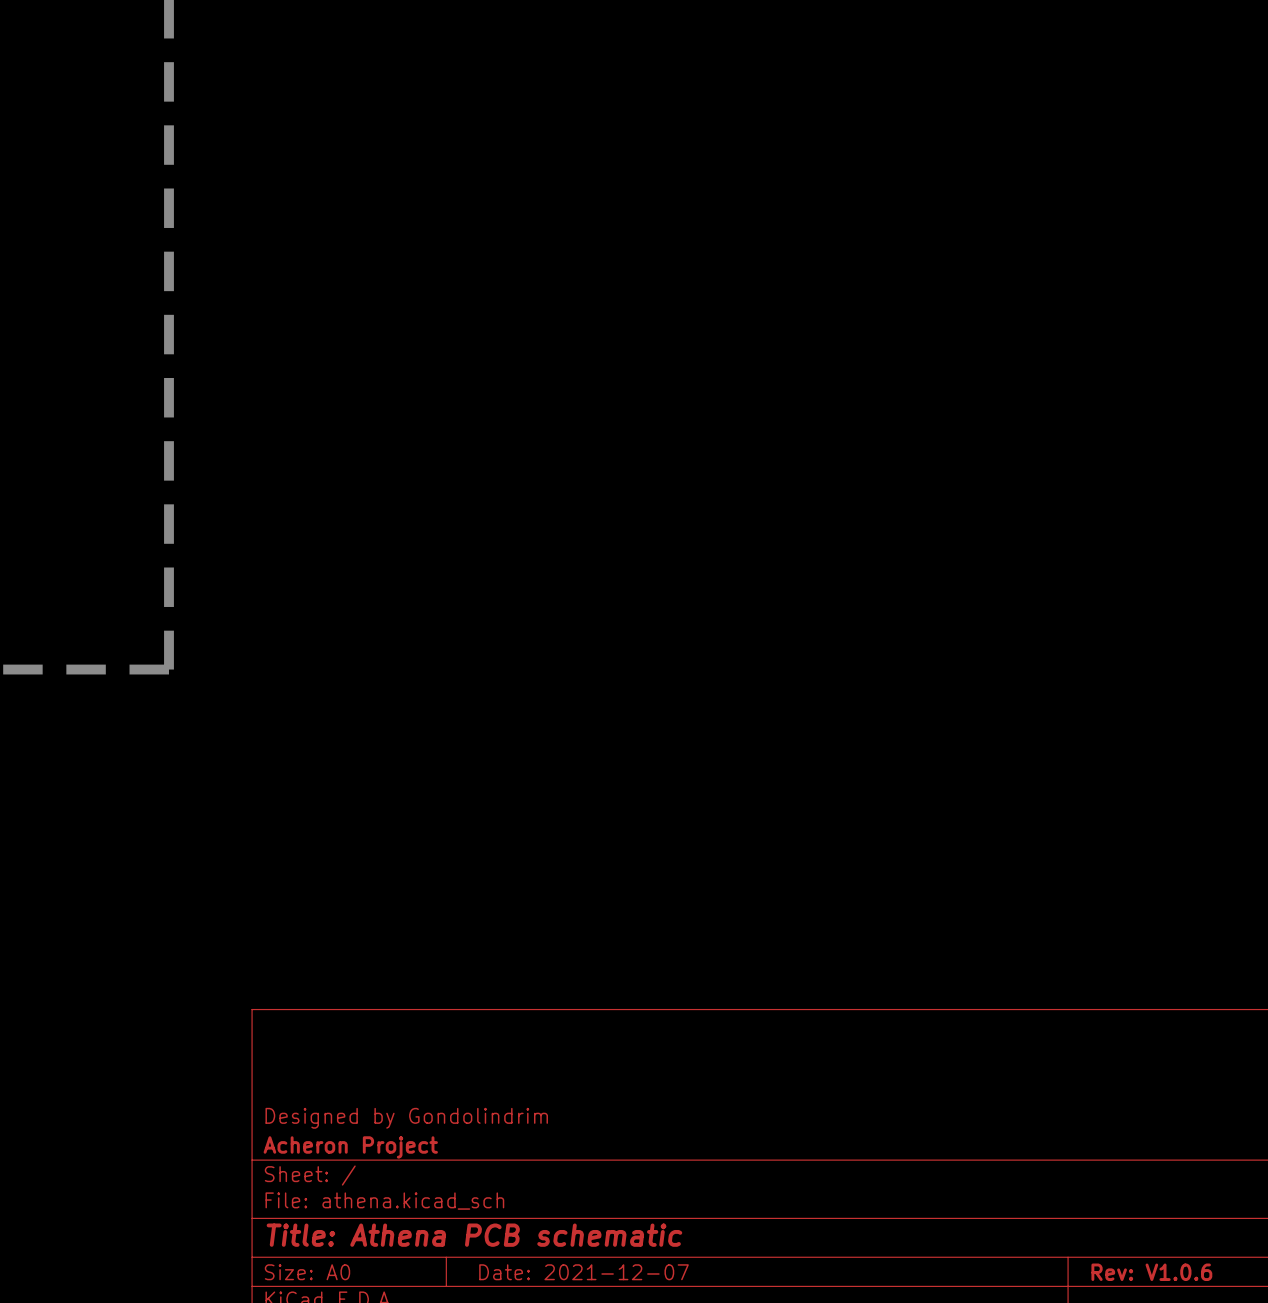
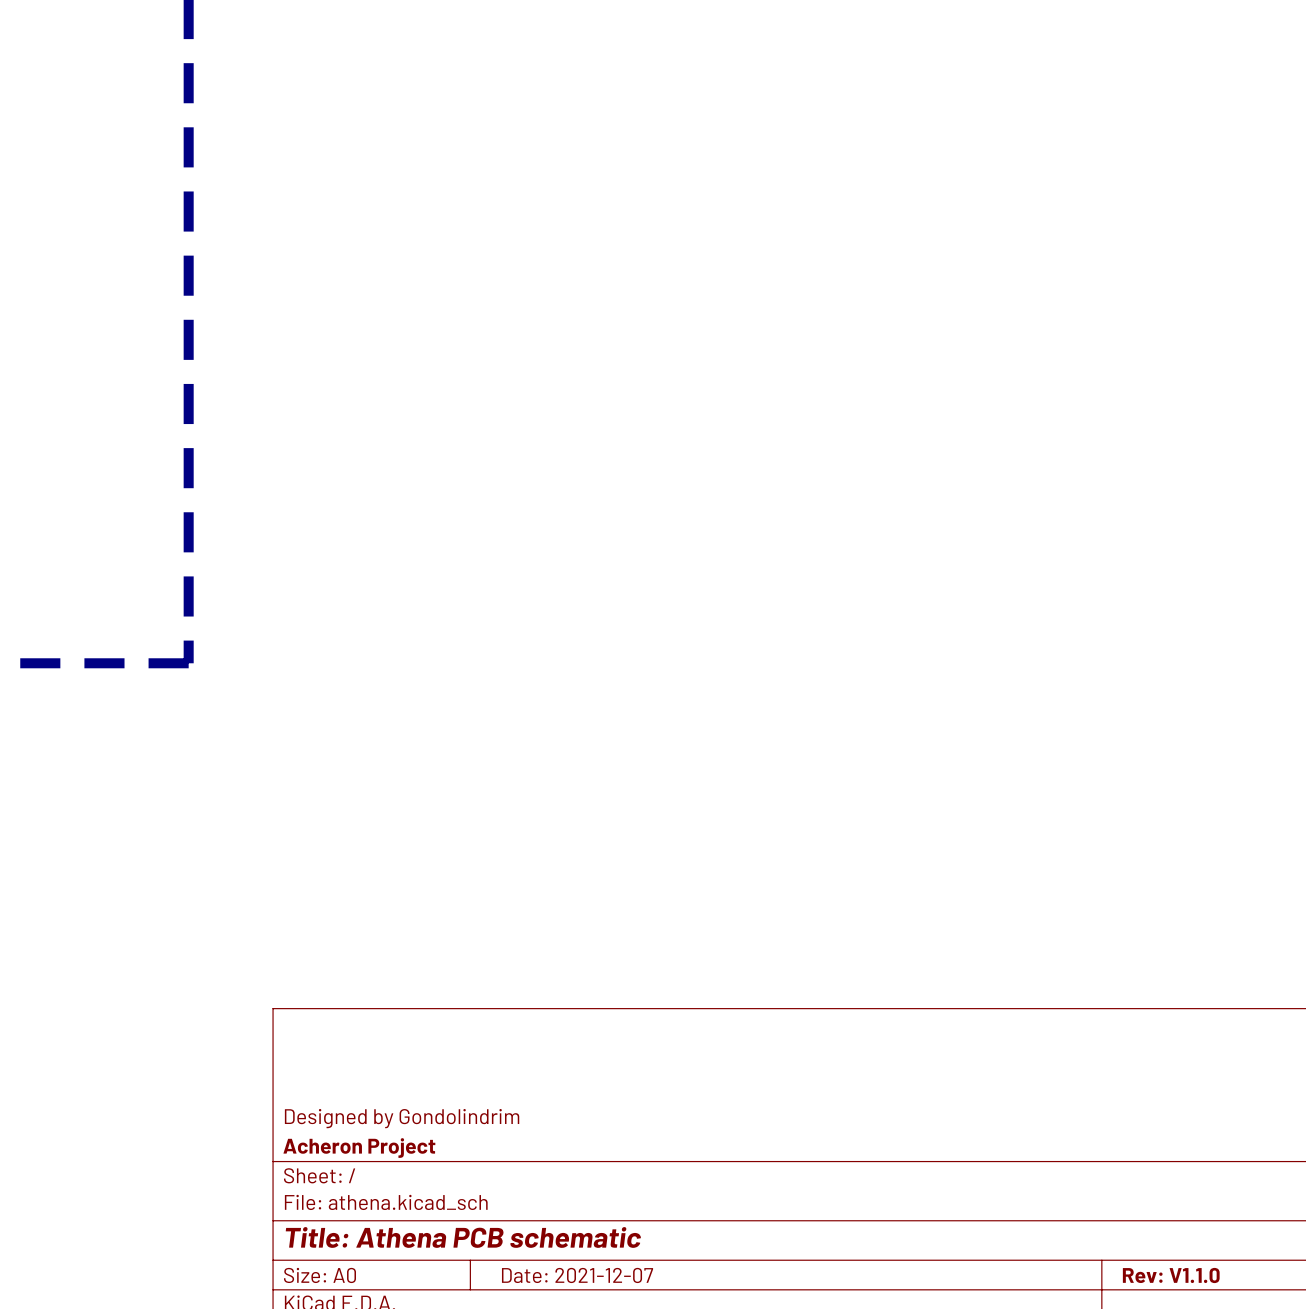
title block: Rev: V1.0.6 (1151, 1272) -> Rev: V1.1.0 (1171, 1275)

